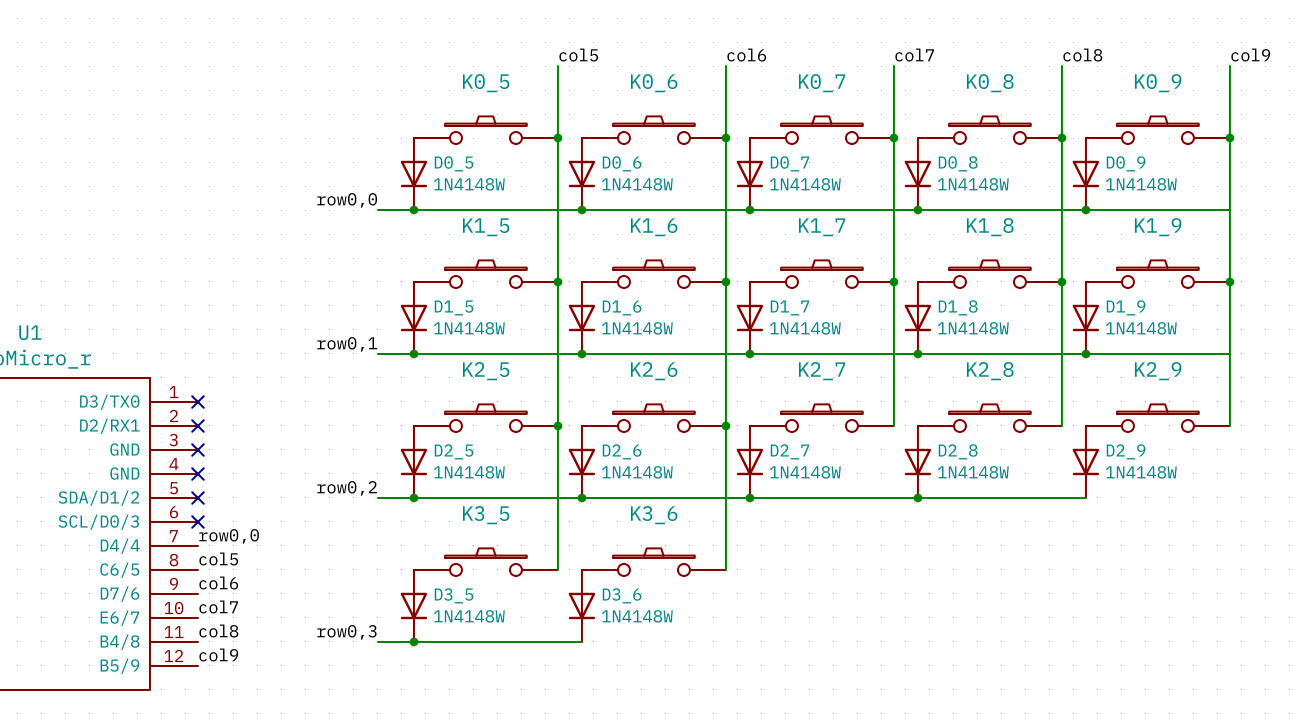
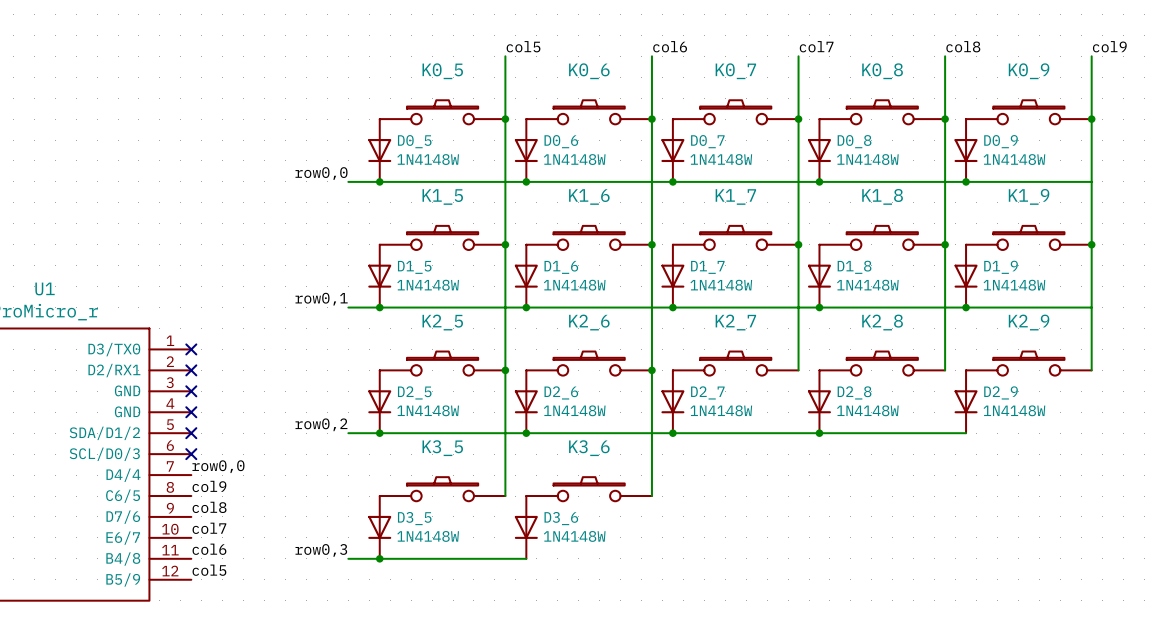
label: col5 (218, 559) -> col9 (209, 486)
label: col6 (218, 583) -> col8 (209, 507)
label: col8 (218, 631) -> col6 (209, 549)
label: col9 (218, 655) -> col5 (209, 570)

